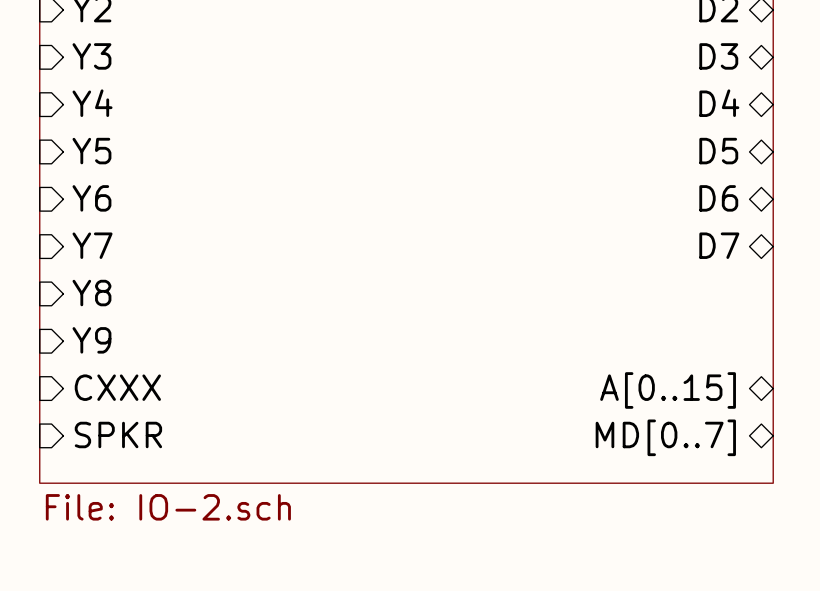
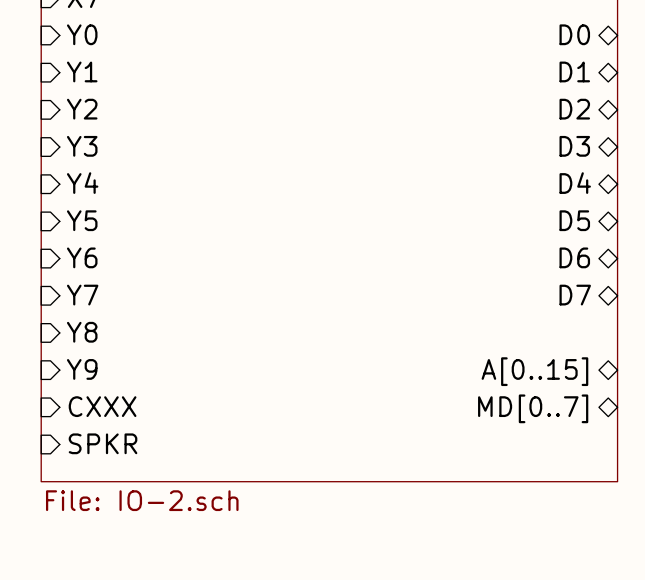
sheet pin: none -> A[0..15] (534, 371)
sheet pin: A[0..15] (668, 390) -> MD[0..7] (533, 408)
sheet pin: MD[0..7] (665, 437) -> none

